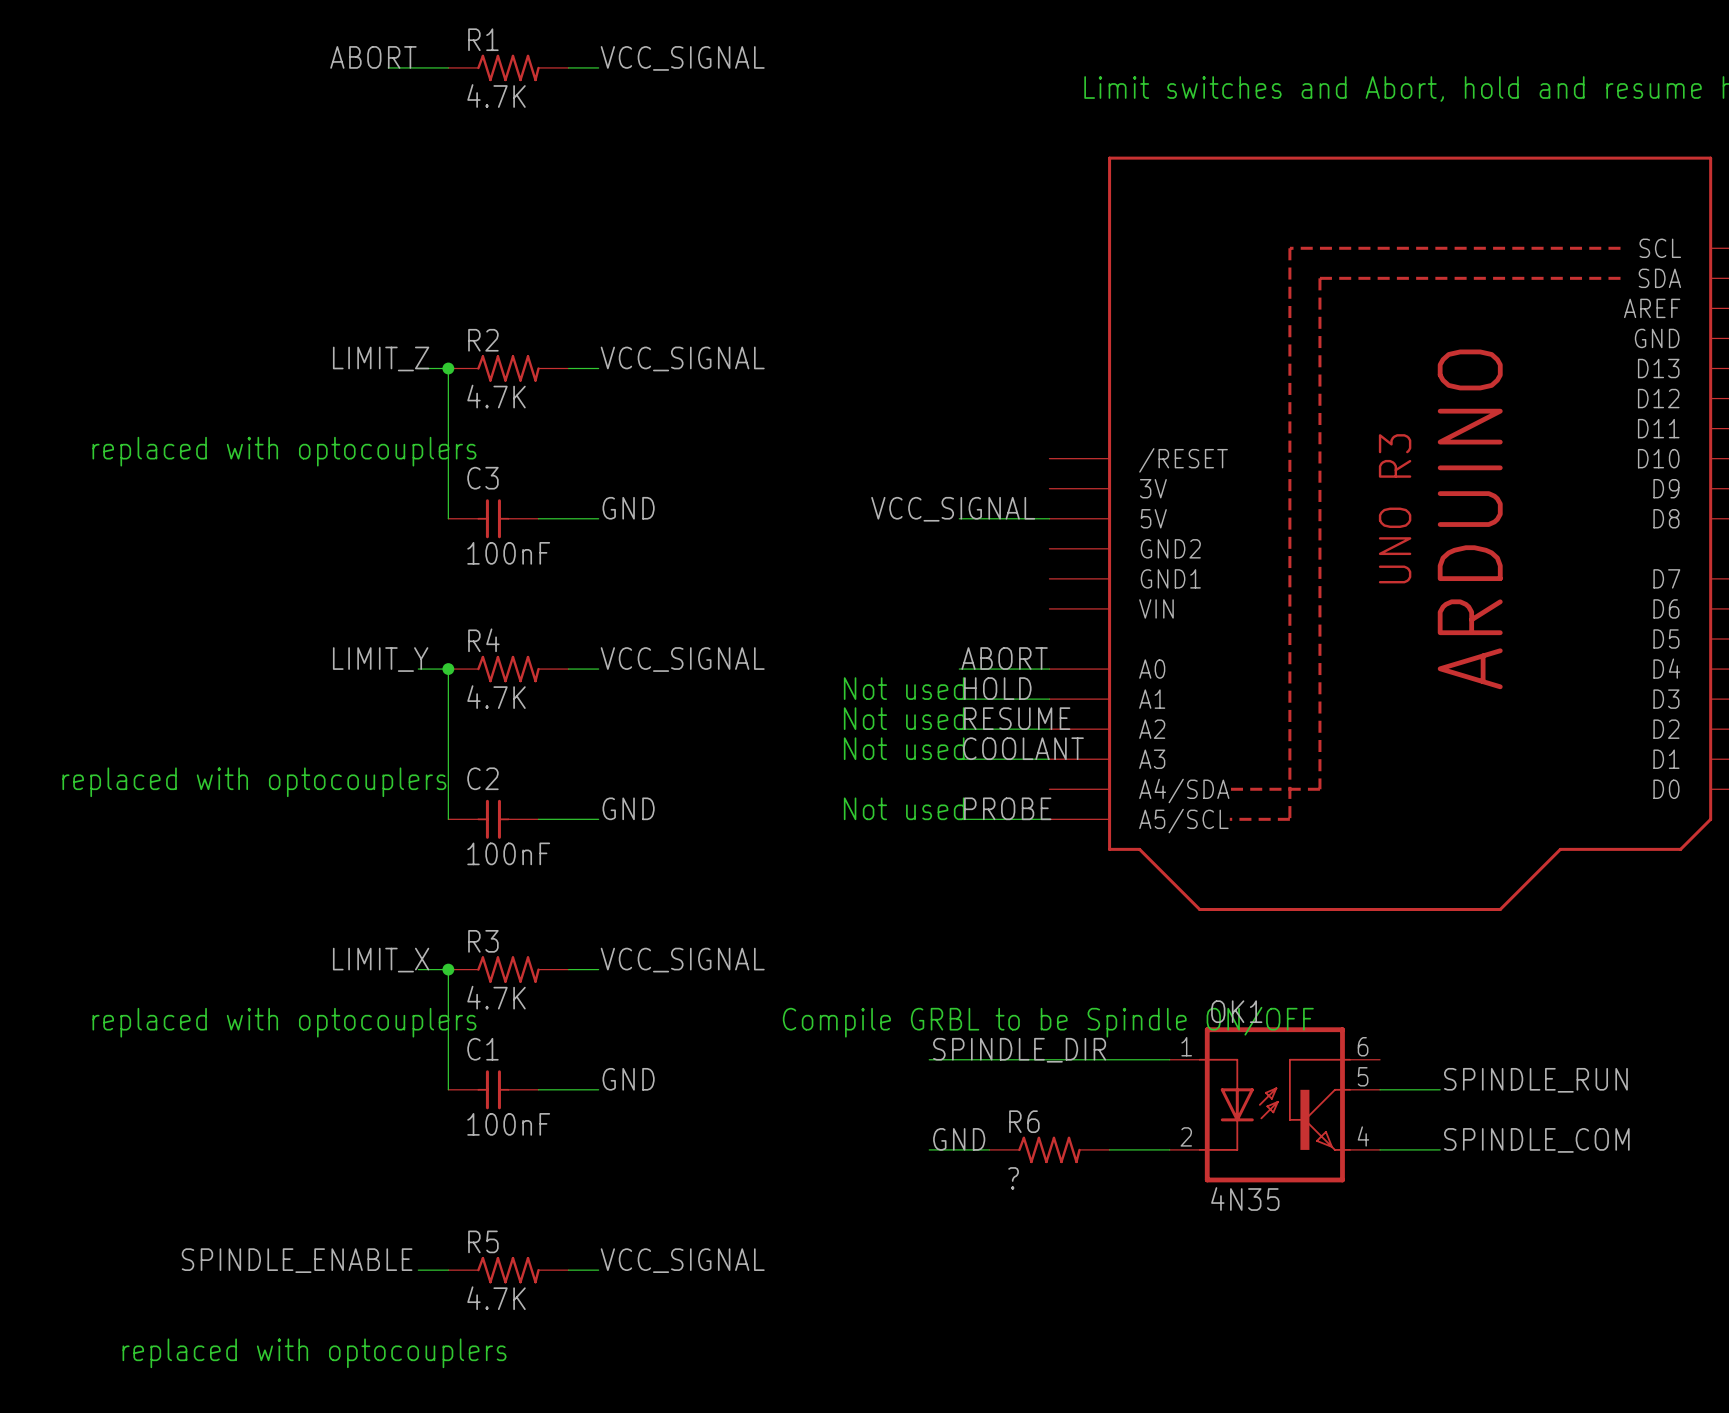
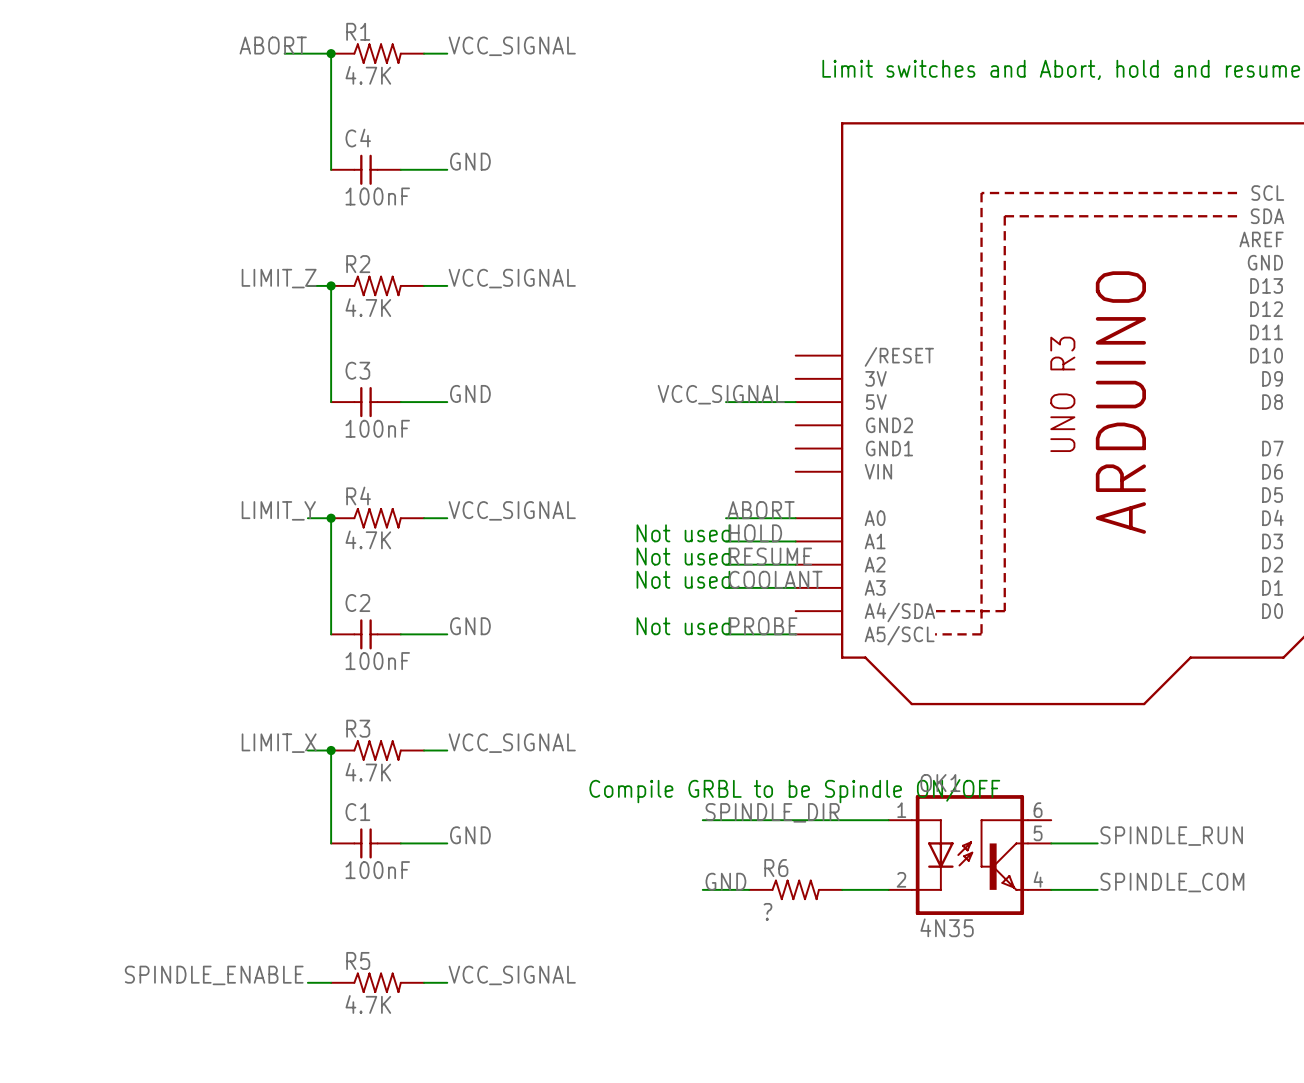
wire: none -> (331, 53) (331, 169)
junction: none -> (331, 53)
label: none -> GND (470, 161)
C4: none -> 100nF (365, 169)
wire: none -> (400, 169) (447, 169)
text: replaced with optocouplers (284, 451) -> none
text: replaced with optocouplers (254, 782) -> none
text: replaced with optocouplers (284, 1022) -> none
text: replaced with optocouplers (314, 1353) -> none

